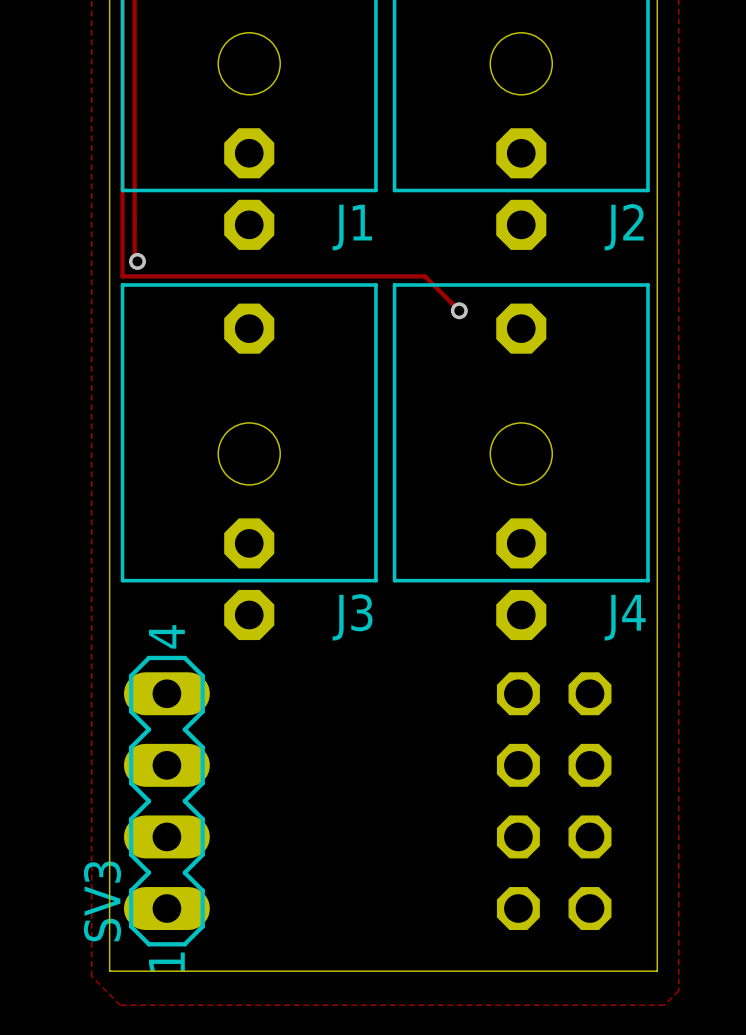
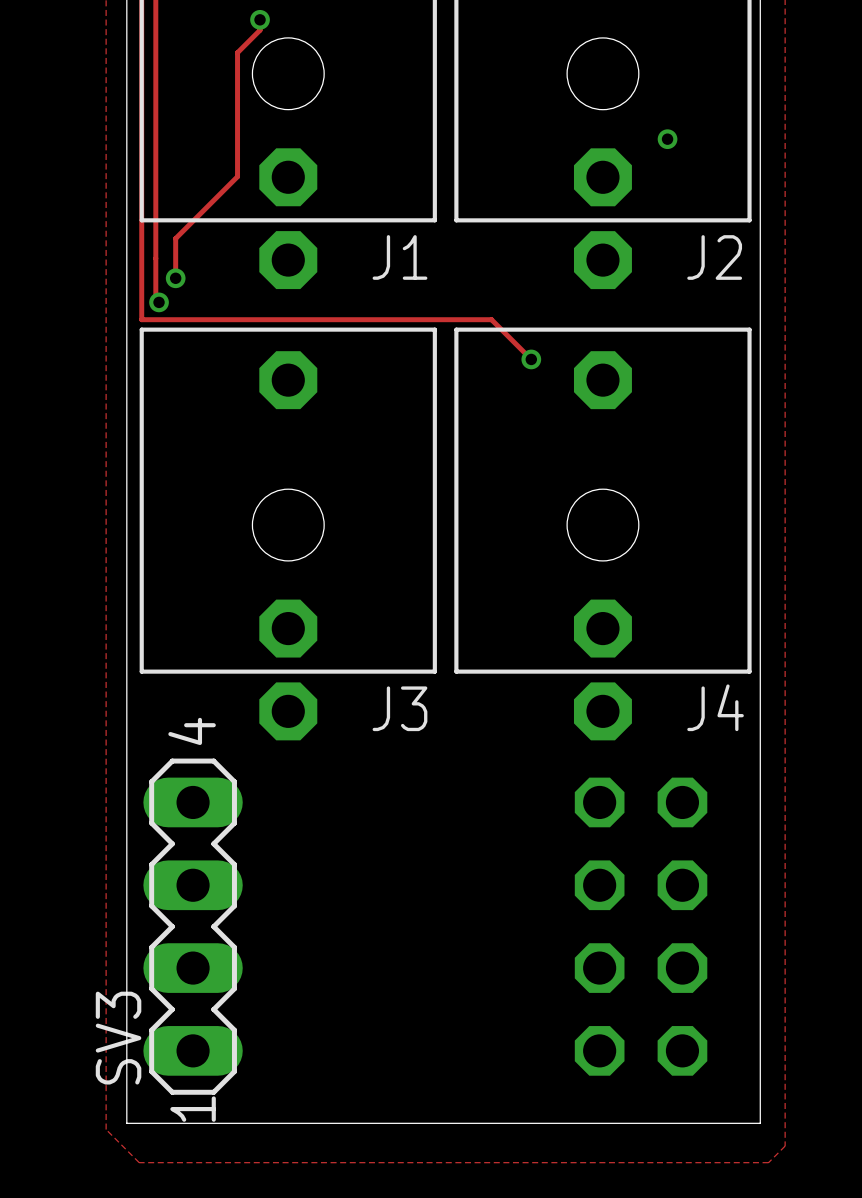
track: none -> (260, 19) (260, 30) (237, 52) (237, 176) (175, 238) (175, 278)
via: none -> (260, 19)
via: none -> (667, 139)
via: none -> (175, 278)

